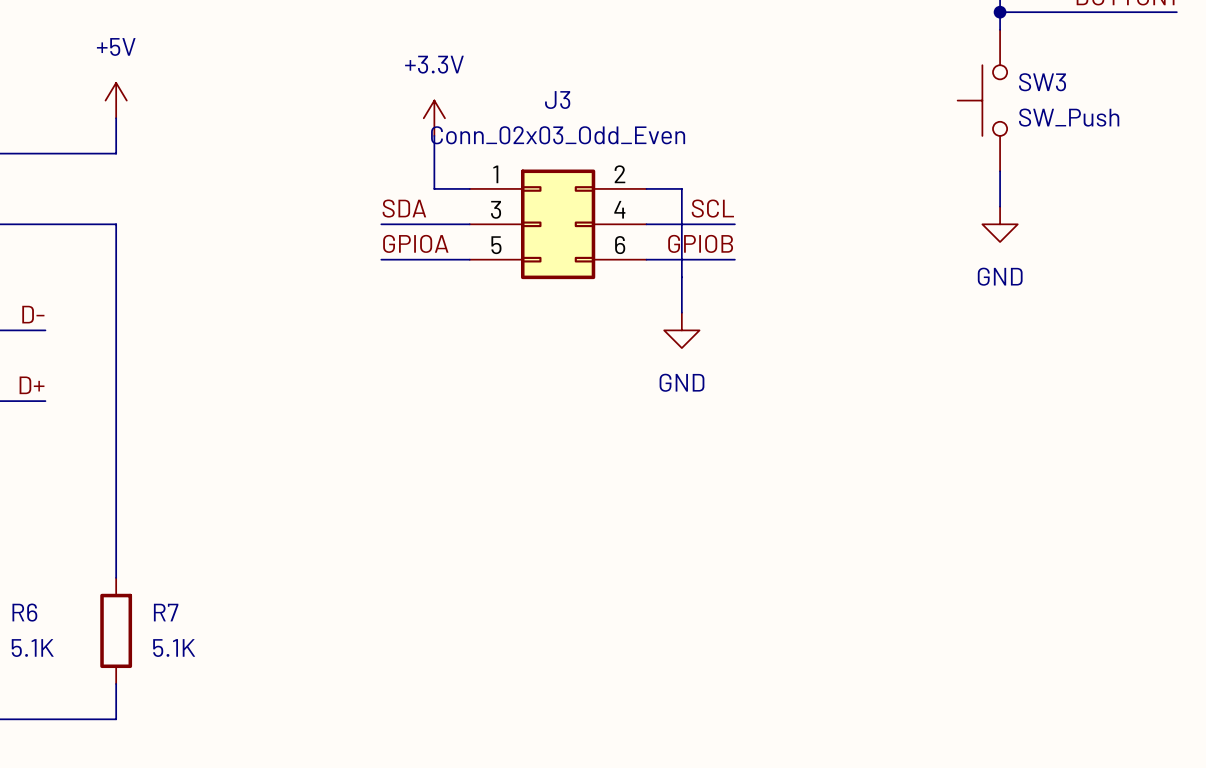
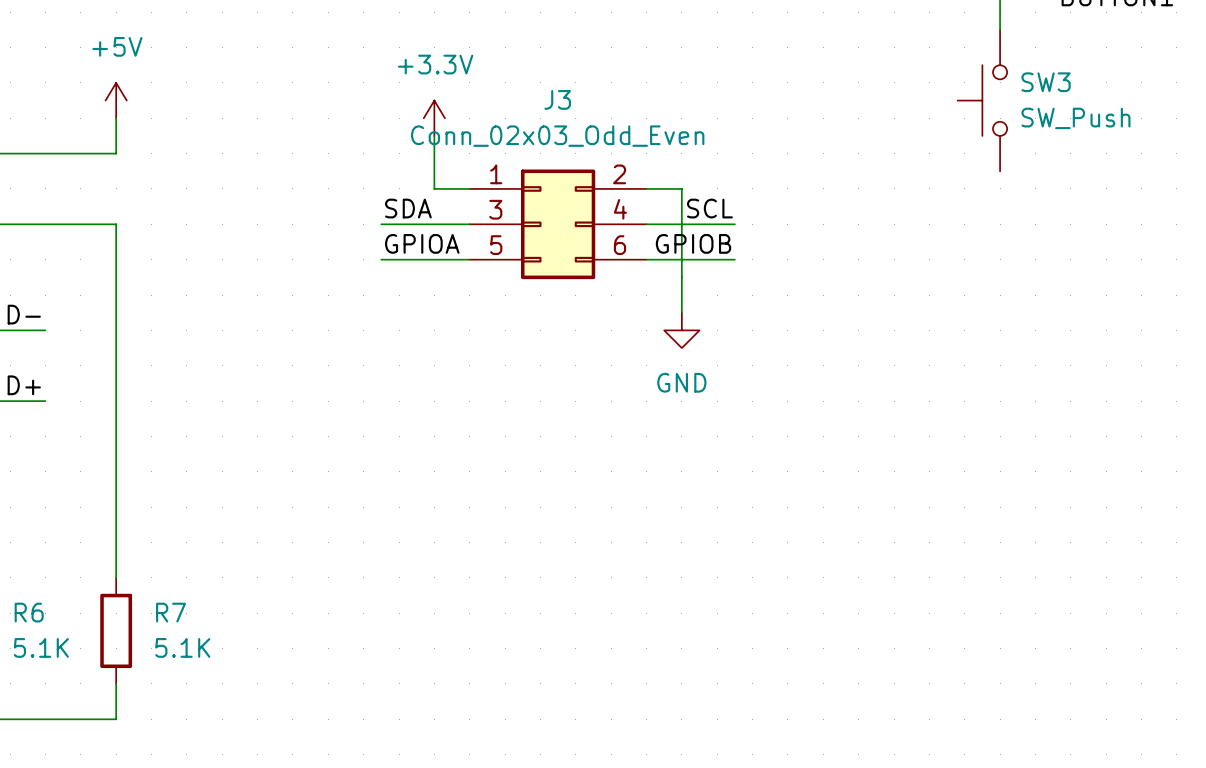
wire: (1000, 12) (1176, 12) -> none
junction: (1000, 12) -> none
wire: (1000, 171) (1000, 206) -> none
power symbol: GND (1000, 224) -> none

